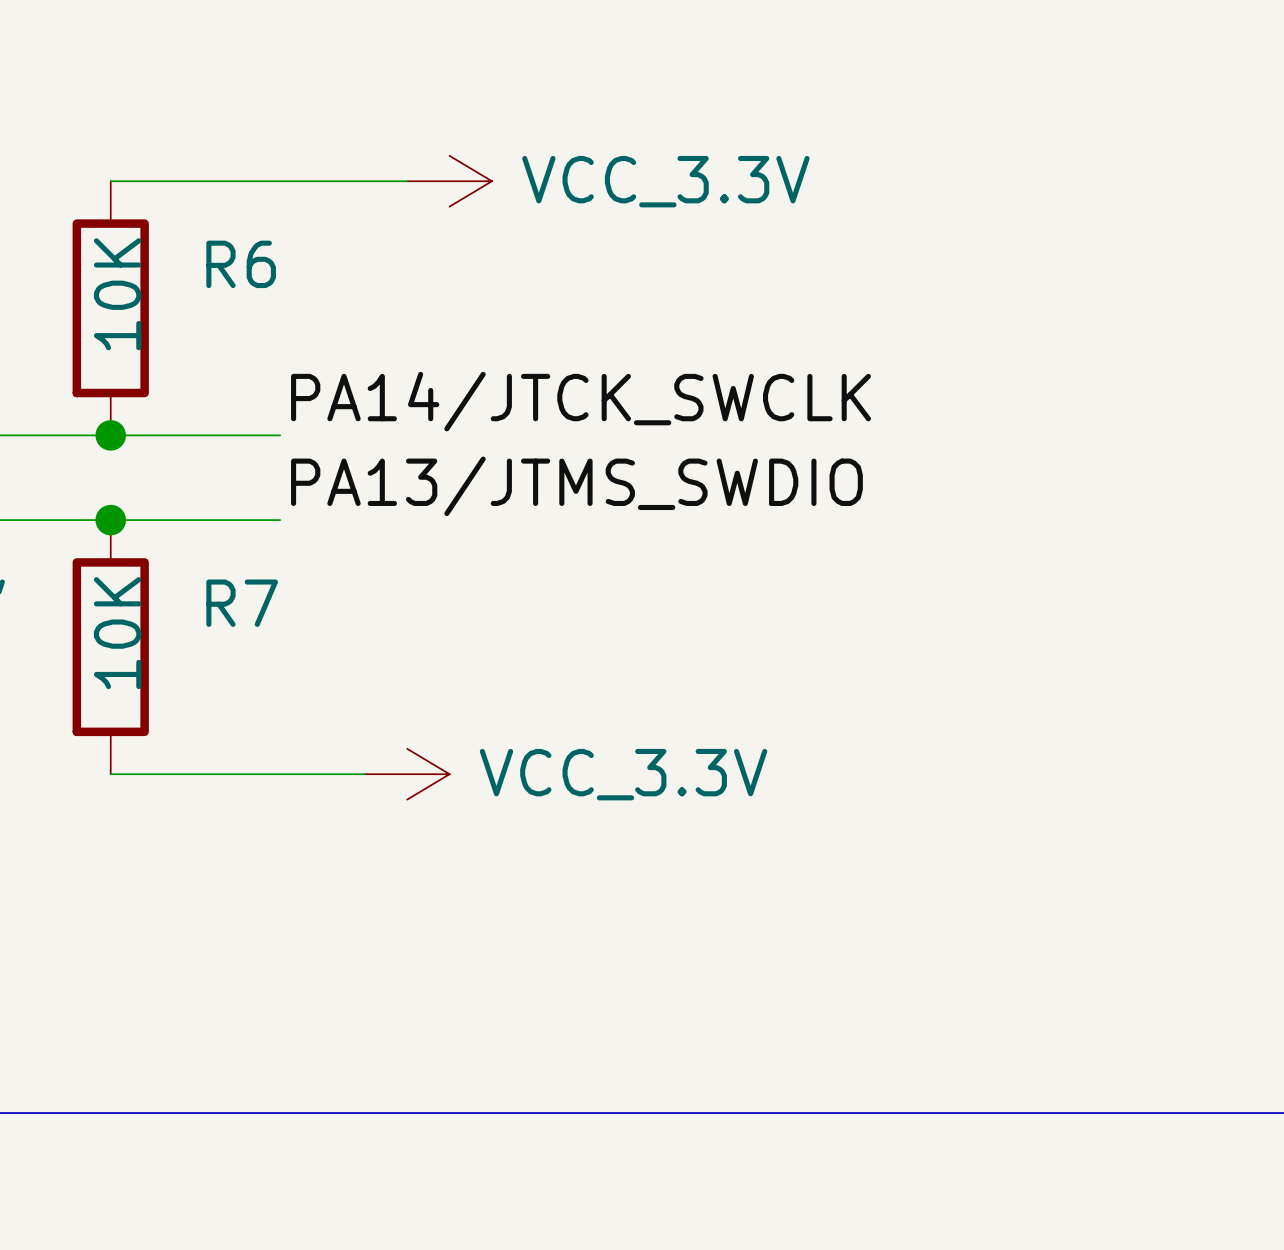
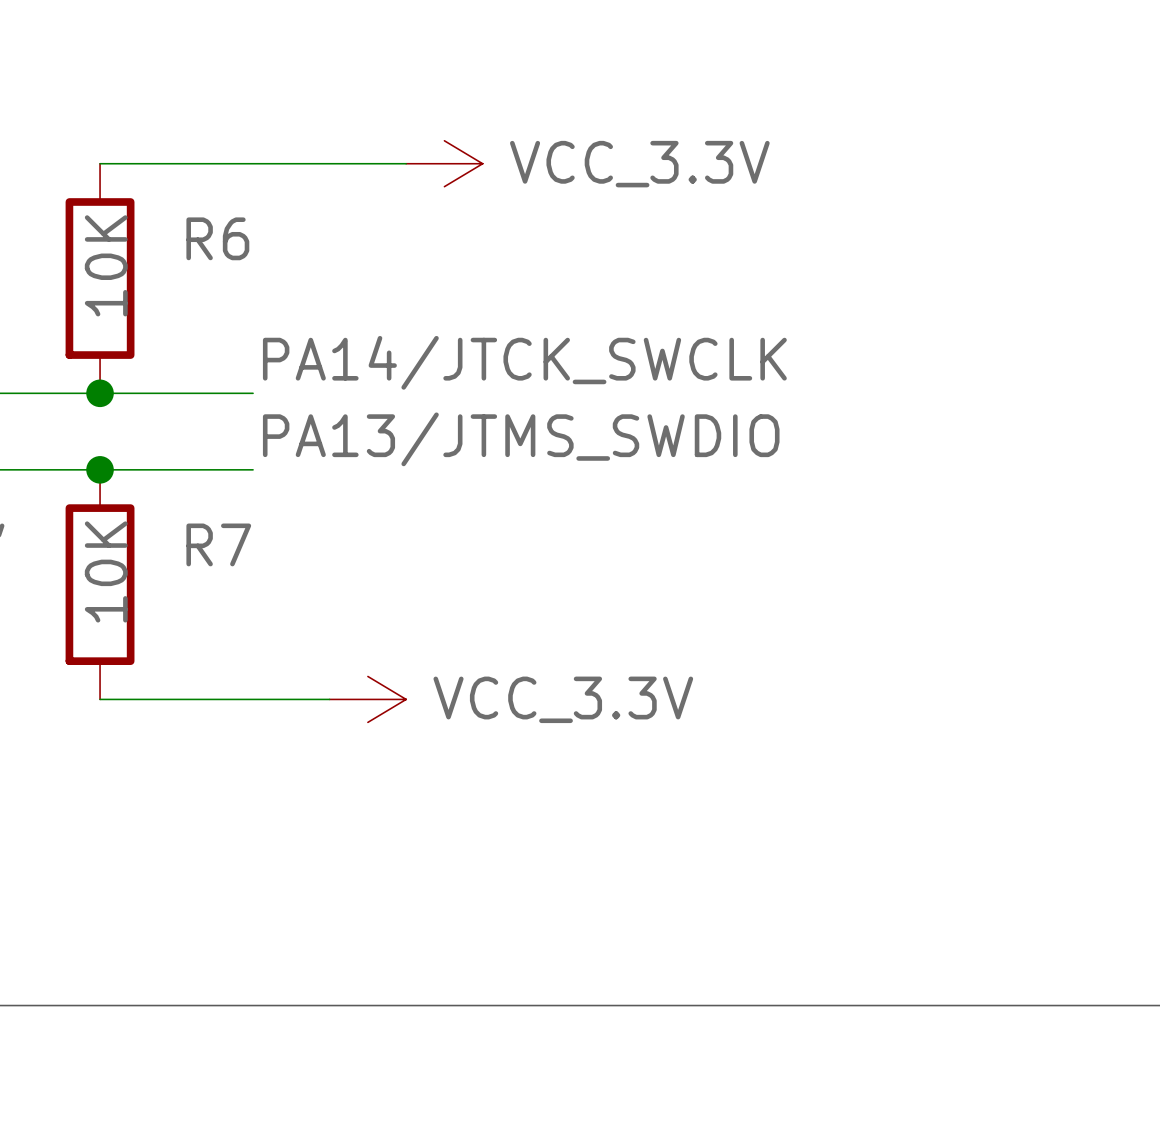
power symbol position: VCC_3.3V (449, 181) -> VCC_3.3V (444, 163)

